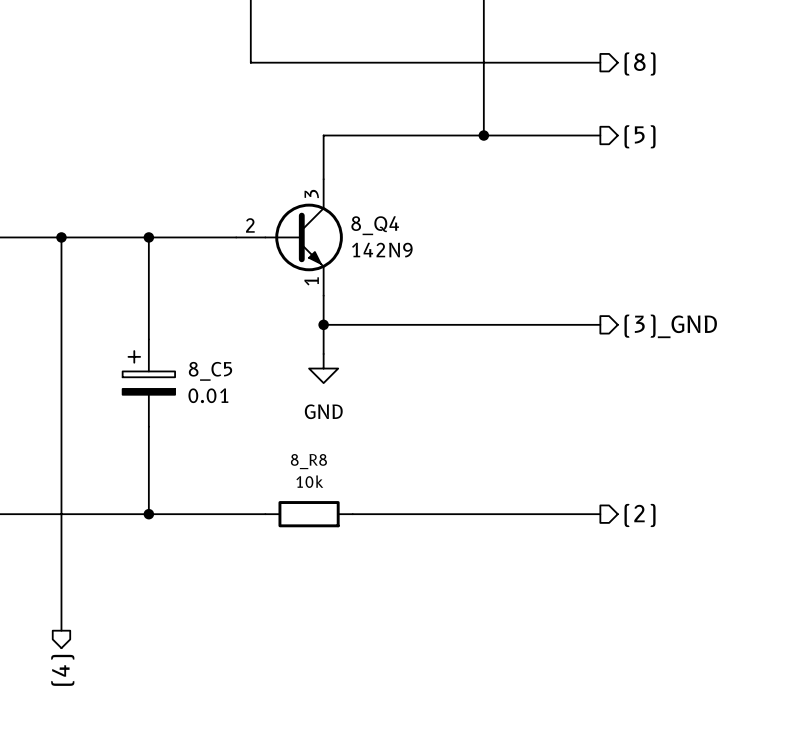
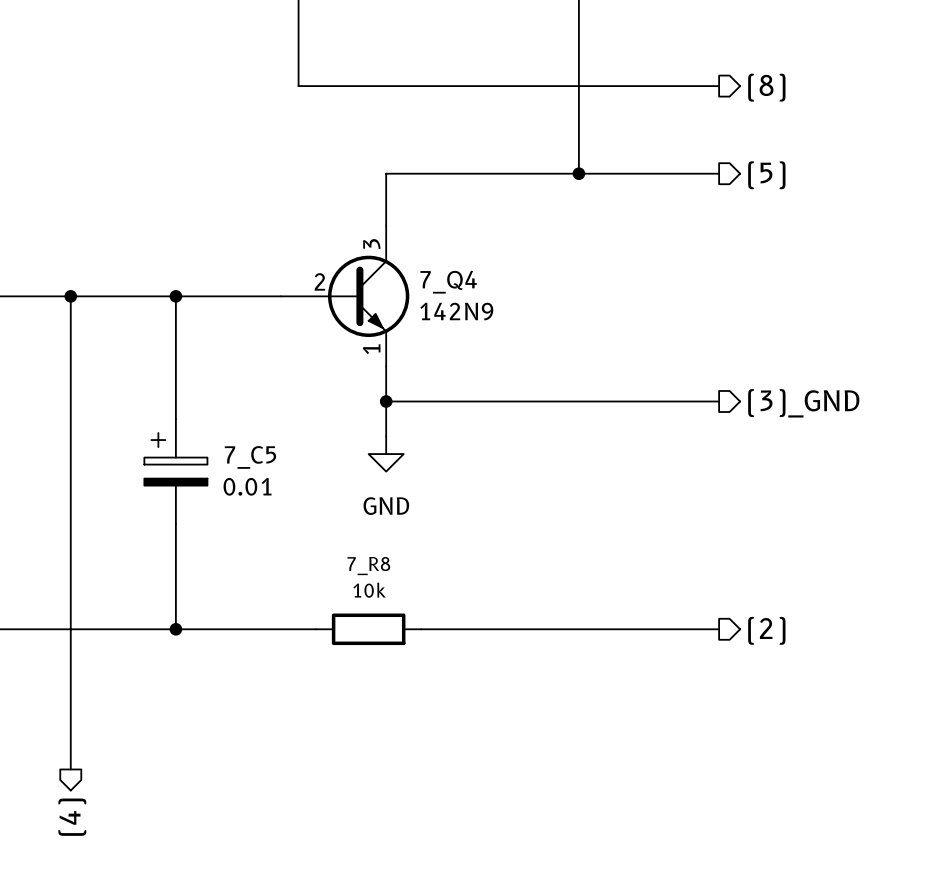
8_Q4: 142N9 (289, 237) -> none
7_Q4: none -> 142N9 (345, 296)
8_C5 name: 8_C5 (210, 371) -> 7_C5 (250, 457)
8_R8 name: 8_R8 (308, 461) -> 7_R8 (368, 566)

